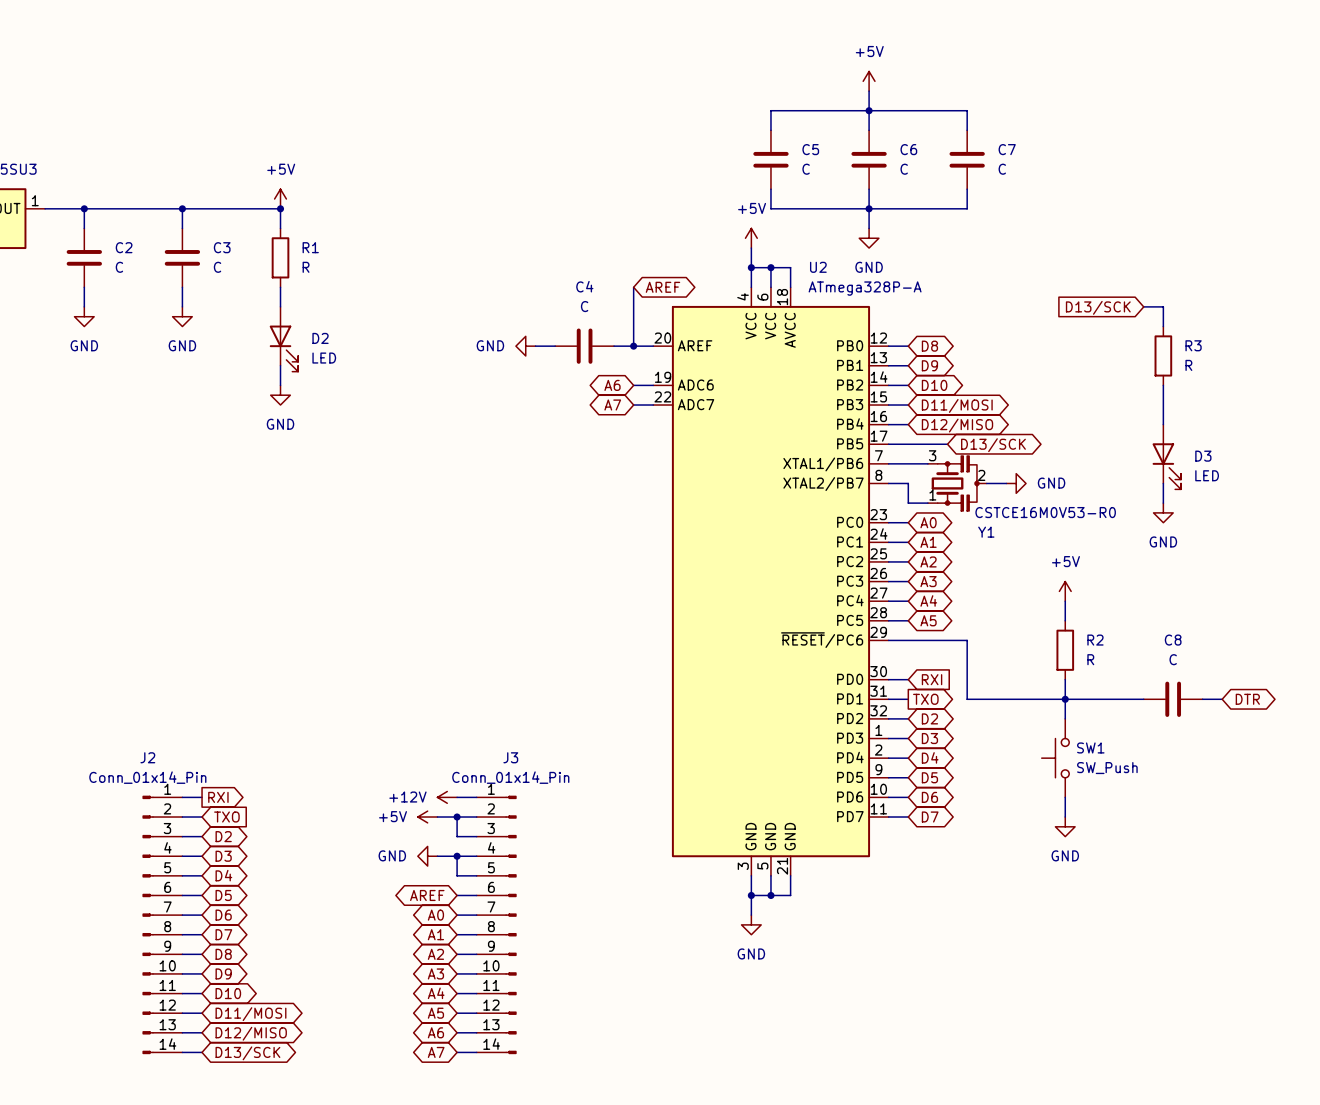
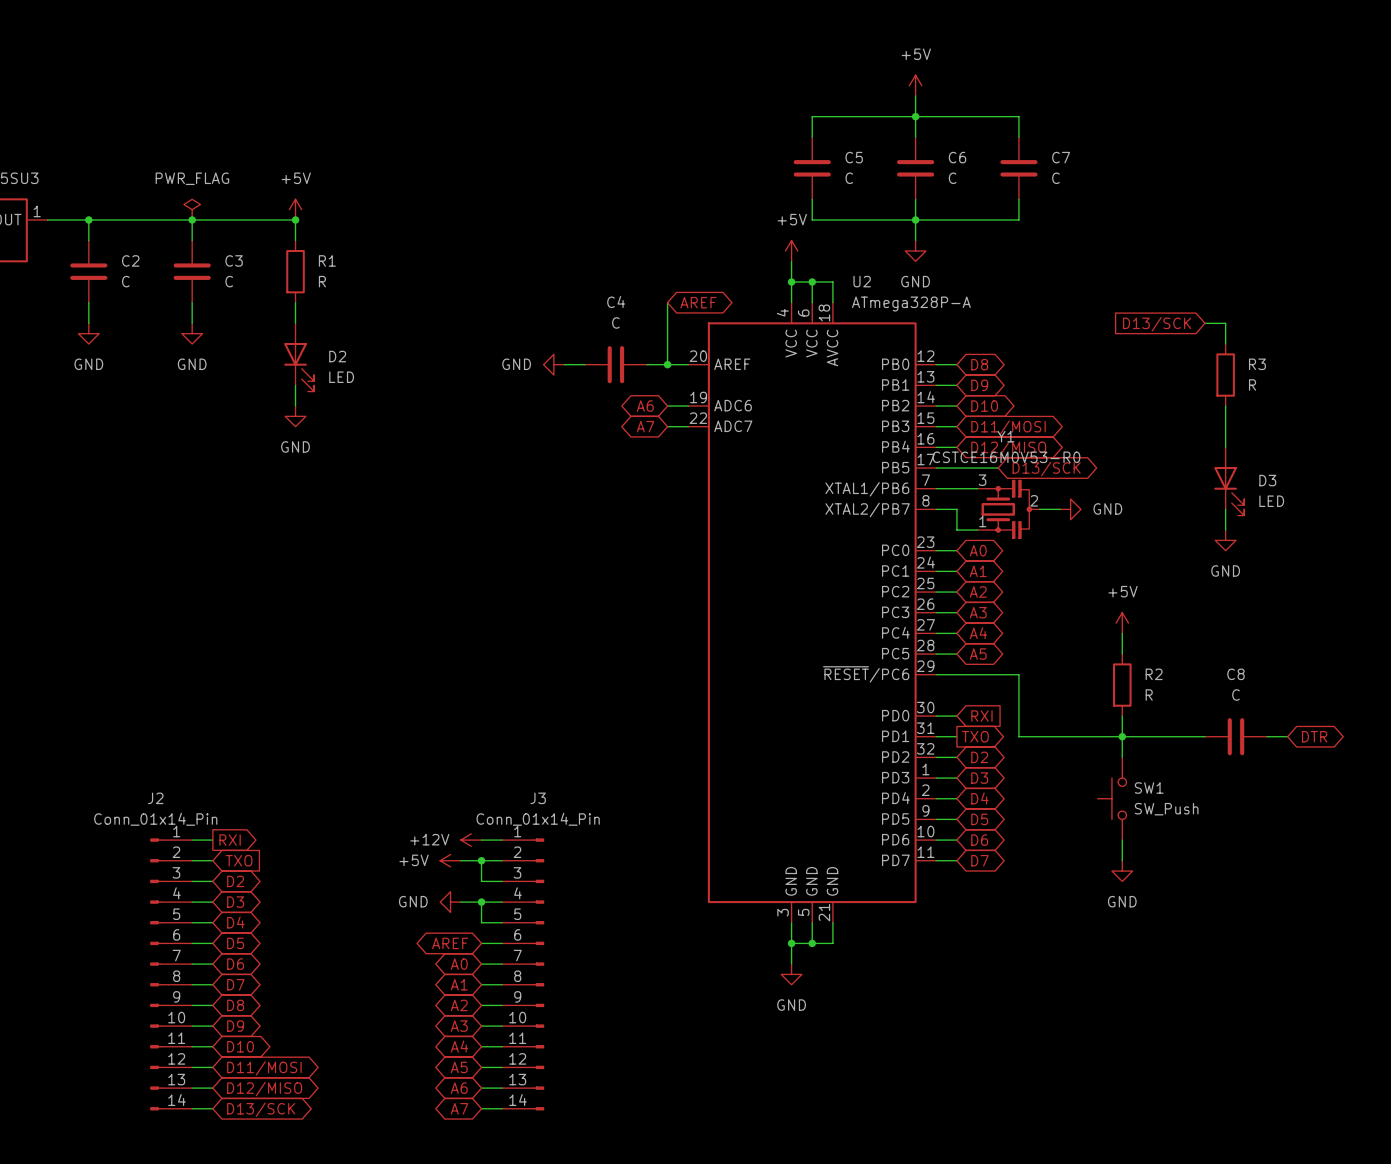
power symbol: none -> PWR_FLAG (192, 209)
Y1 value position: CSTCE16M0V53-R0 (1045, 512) -> CSTCE16M0V53-R0 (1006, 457)
Y1 name position: Y1 (986, 532) -> Y1 (1005, 436)

